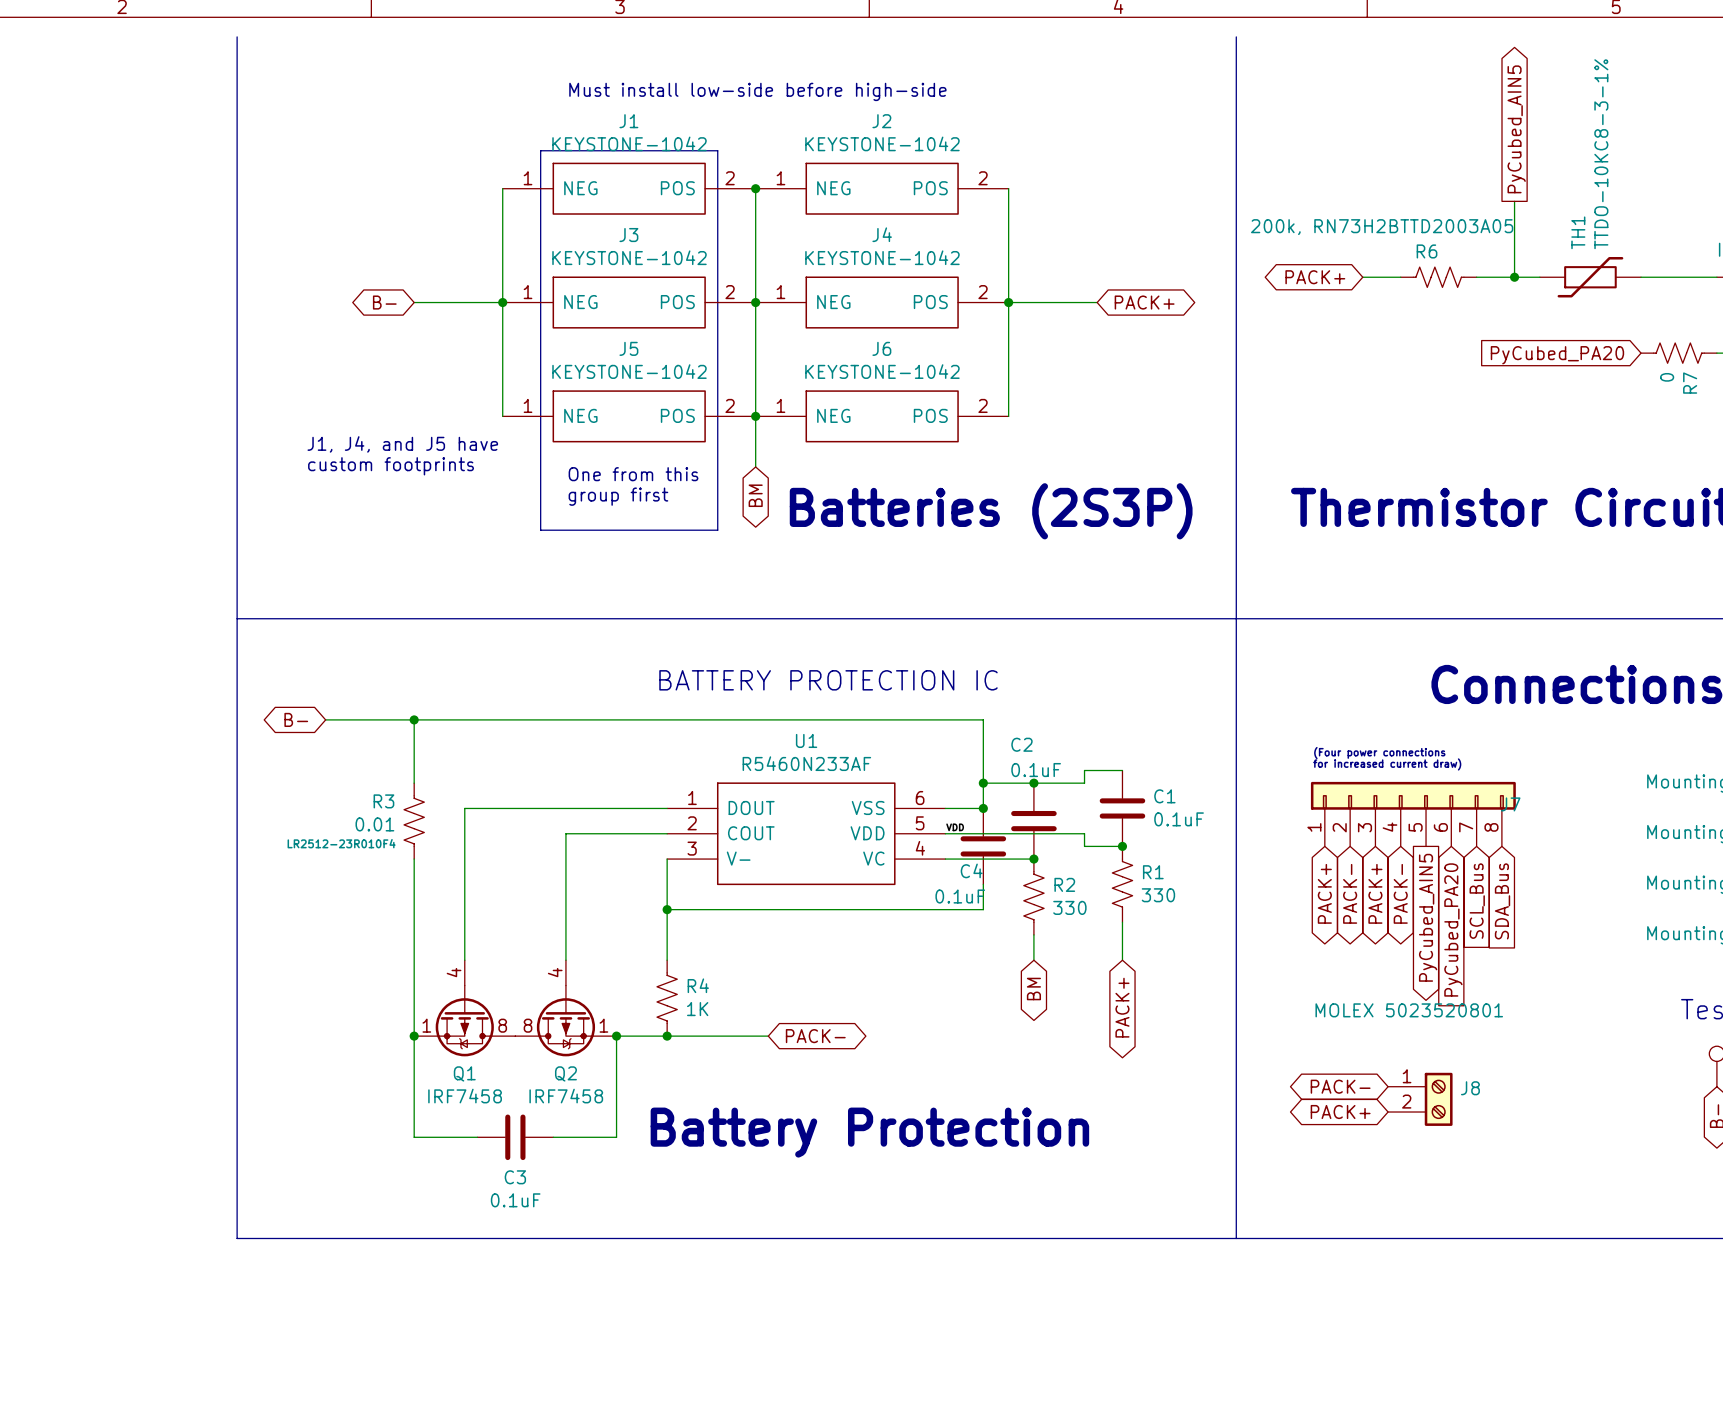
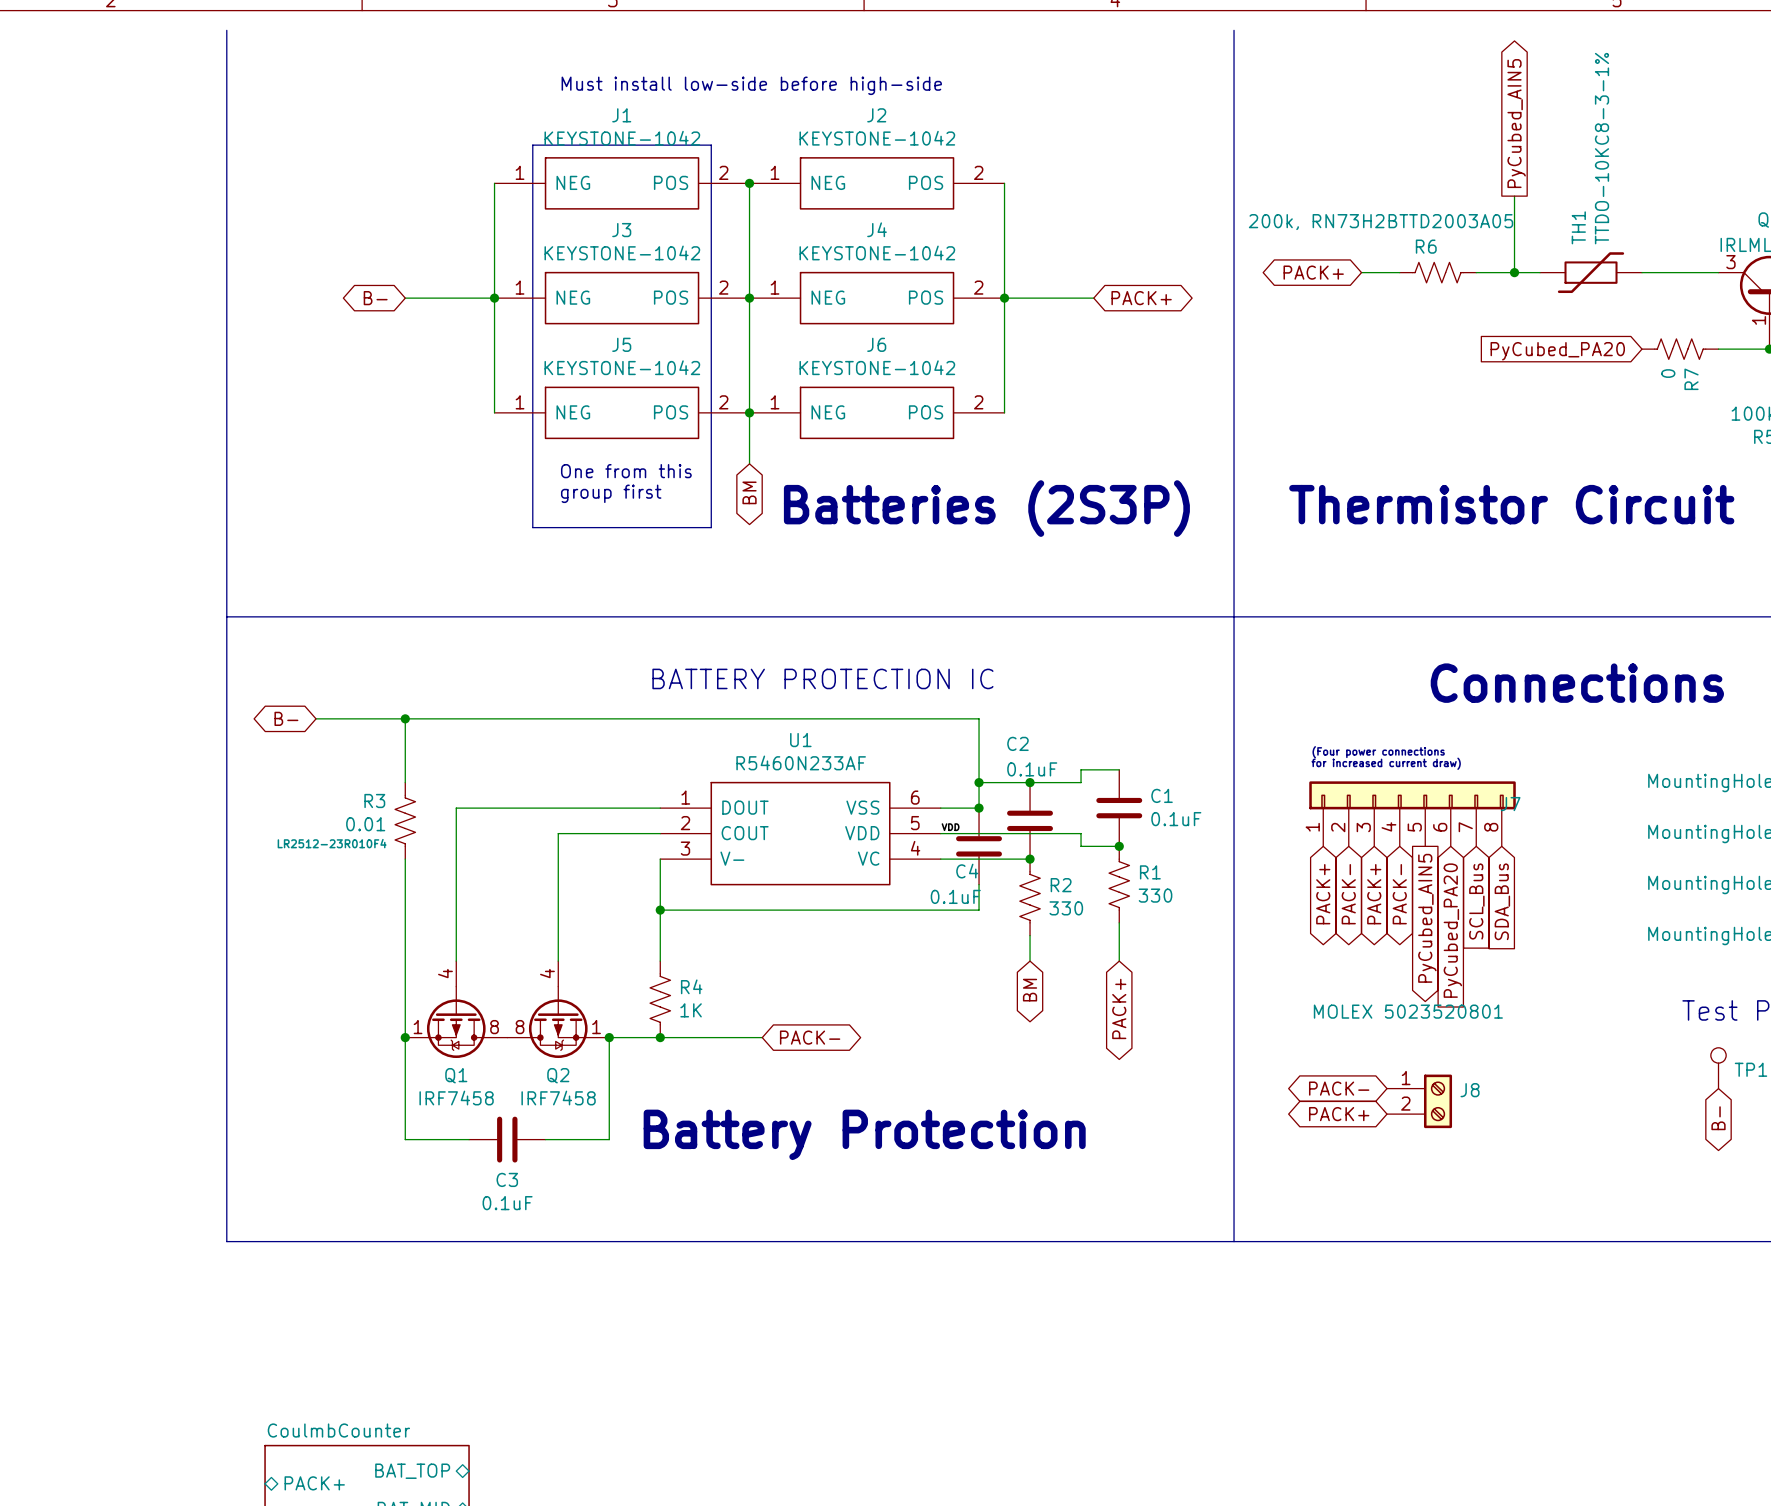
text: J1, J4, and J5 have (402, 444) -> none
text: custom footprints (391, 466) -> none

